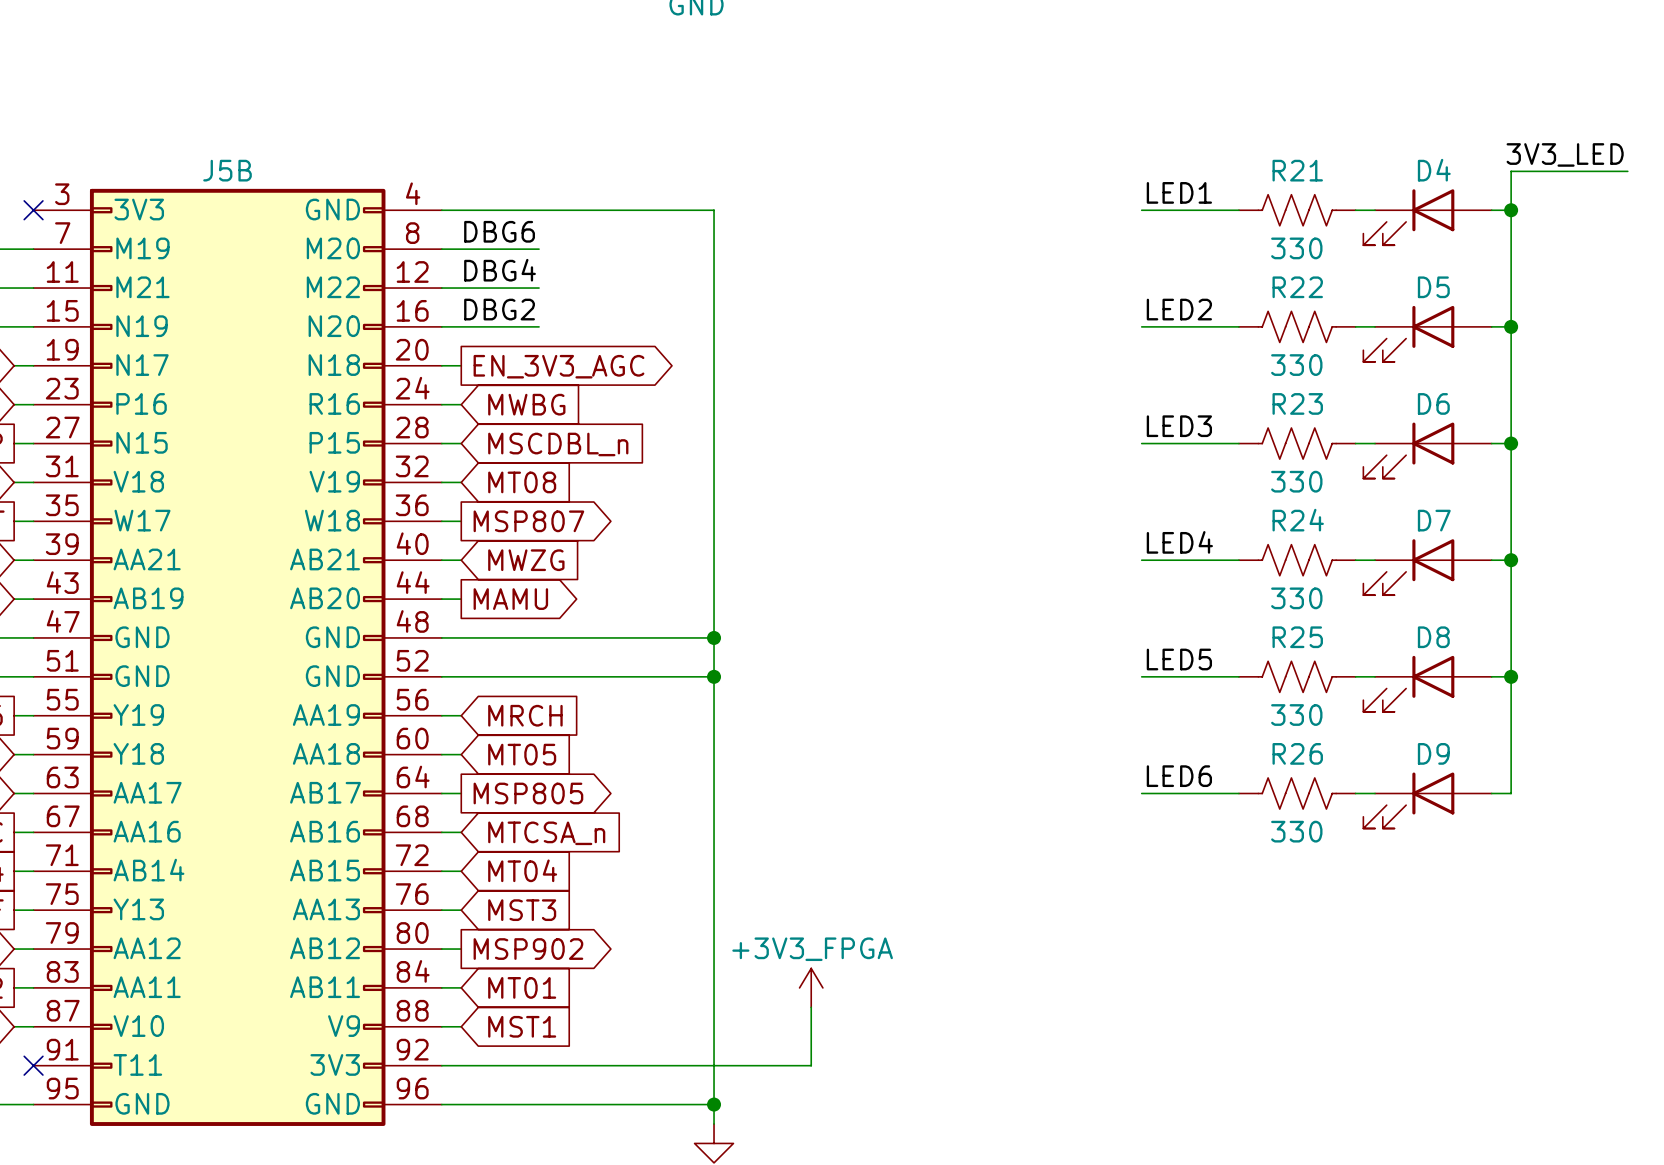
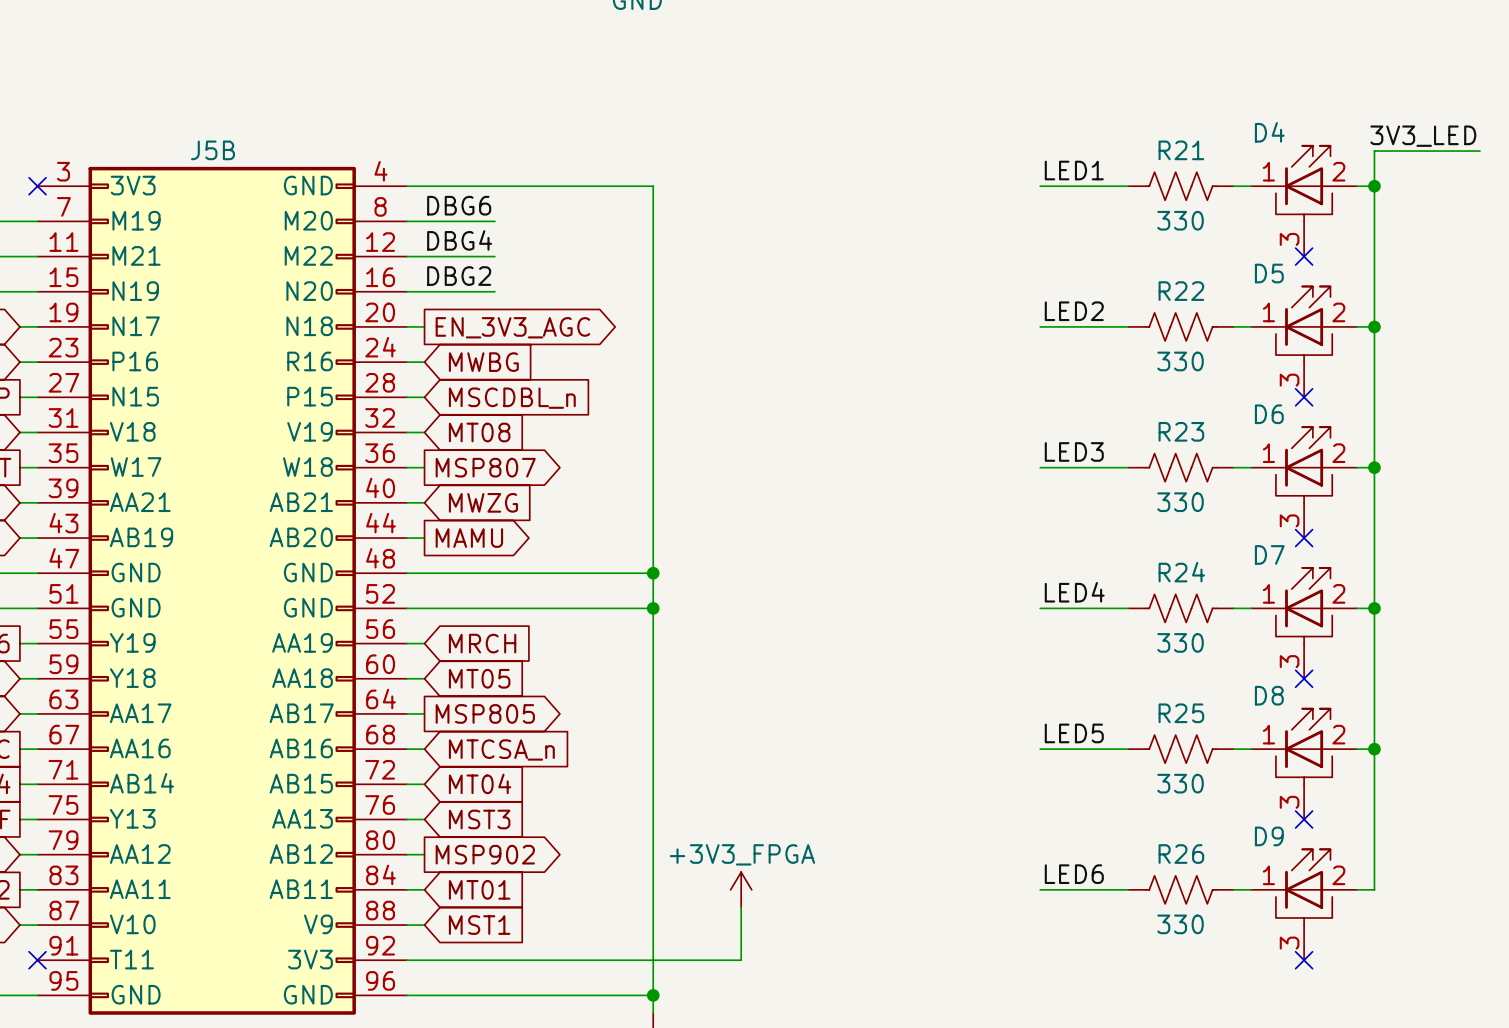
D4 name position: D4 (1434, 170) -> D4 (1269, 132)
D4 symbol: [1363, 189, 1492, 246] -> [1251, 145, 1357, 257]
D5 name position: D5 (1433, 287) -> D5 (1269, 273)
no-connect mark: none -> (1304, 256)
D5 symbol: [1363, 305, 1492, 362] -> [1251, 286, 1357, 398]
label position: LED2 (1179, 309) -> LED2 (1074, 311)
wire: (1141, 326) (1238, 326) -> (1040, 326) (1128, 326)
R22 position: (1297, 326) -> (1180, 326)
wire: (1355, 326) (1375, 326) -> (1233, 326) (1251, 326)
wire: (1491, 326) (1511, 326) -> (1356, 326) (1374, 326)
junction: (1511, 326) -> none
junction: none -> (1374, 326)
D6 name position: D6 (1433, 403) -> D6 (1269, 414)
D6 symbol: [1363, 422, 1492, 479] -> [1251, 427, 1357, 539]
label position: LED3 (1179, 426) -> LED3 (1074, 451)
wire: (1141, 443) (1238, 443) -> none
R23 position: (1297, 443) -> (1180, 467)
wire: (1355, 443) (1375, 443) -> none
no-connect mark: none -> (1304, 397)
wire: (1491, 443) (1511, 443) -> none
junction: (1511, 443) -> none
D7 name position: D7 (1434, 520) -> D7 (1269, 554)
junction: none -> (1374, 467)
D7 symbol: [1363, 539, 1492, 596] -> [1251, 567, 1357, 679]
label: LED4 (1179, 542) -> none
wire: (1141, 560) (1238, 560) -> (1040, 467) (1128, 467)
R24: 330 (1297, 560) -> none
wire: (1355, 560) (1375, 560) -> (1233, 467) (1251, 467)
wire: (1491, 560) (1511, 560) -> (1356, 467) (1374, 467)
junction: (1511, 560) -> none
no-connect mark: none -> (1304, 538)
R25 name: R25 (1297, 637) -> R24 (1181, 572)
D8 name position: D8 (1433, 637) -> D8 (1269, 695)
D8 symbol: [1363, 655, 1492, 712] -> [1251, 708, 1357, 820]
label: LED5 (1179, 659) -> LED4 (1074, 592)
D9 name position: D9 (1433, 753) -> D9 (1269, 836)
no-connect mark: none -> (1304, 678)
D9 symbol: [1363, 772, 1492, 829] -> [1251, 849, 1357, 961]
label position: LED6 (1179, 776) -> LED6 (1074, 874)
wire: (1141, 793) (1238, 793) -> (1040, 749) (1128, 749)
R26 position: (1297, 793) -> (1180, 889)
wire: (1355, 793) (1375, 793) -> (1233, 749) (1251, 749)
wire: (1491, 793) (1511, 793) -> (1356, 889) (1374, 889) (1374, 713)
label: none -> LED5 (1074, 733)
R25: none -> 330 (1180, 749)
wire: none -> (1356, 749) (1374, 749)
junction: none -> (1374, 749)
no-connect mark: none -> (1304, 819)
wire: none -> (1040, 889) (1128, 889)
wire: none -> (1233, 889) (1251, 889)
no-connect mark: none -> (1304, 960)

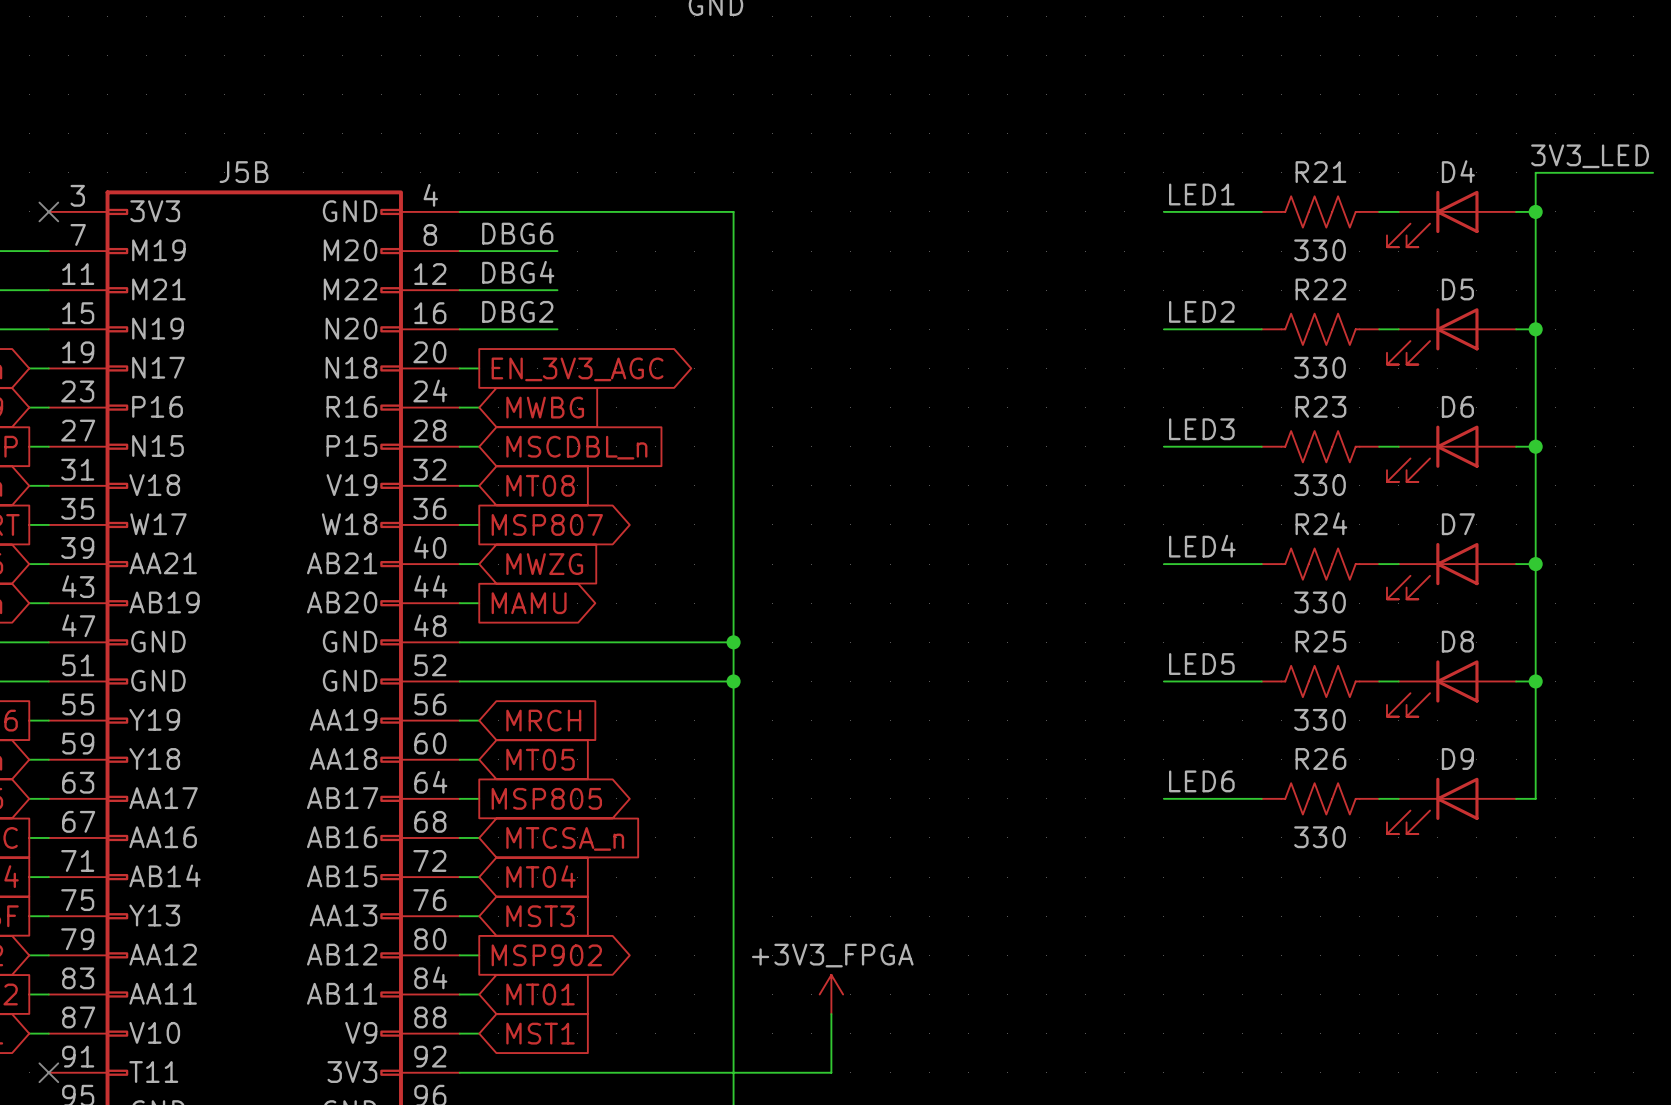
D4 name position: D4 (1269, 132) -> D4 (1458, 171)
D4 symbol: [1251, 145, 1357, 257] -> [1386, 190, 1517, 248]
no-connect mark: (1304, 256) -> none
D5 name position: D5 (1269, 273) -> D5 (1457, 289)
D5 symbol: [1251, 286, 1357, 398] -> [1386, 308, 1517, 365]
junction: none -> (1535, 329)
label position: LED2 (1074, 311) -> LED2 (1201, 311)
wire: (1040, 326) (1128, 326) -> (1163, 329) (1261, 329)
R22 position: (1180, 326) -> (1320, 329)
wire: (1233, 326) (1251, 326) -> (1379, 329) (1398, 329)
wire: (1356, 326) (1374, 326) -> (1516, 329) (1535, 329)
junction: (1374, 326) -> none
wire: none -> (1163, 446) (1261, 446)
wire: none -> (1379, 446) (1398, 446)
no-connect mark: (1304, 397) -> none
wire: none -> (1516, 446) (1535, 446)
junction: none -> (1535, 446)
D6 name position: D6 (1269, 414) -> D6 (1457, 406)
D6 symbol: [1251, 427, 1357, 539] -> [1386, 425, 1517, 482]
label position: LED3 (1074, 451) -> LED3 (1201, 429)
wire: (1040, 467) (1128, 467) -> (1163, 564) (1261, 564)
R23 position: (1180, 467) -> (1320, 446)
wire: (1233, 467) (1251, 467) -> (1379, 564) (1398, 564)
wire: (1356, 467) (1374, 467) -> (1516, 564) (1535, 564)
junction: (1374, 467) -> none
label: none -> LED4 (1202, 546)
R24: none -> 330 (1320, 564)
junction: none -> (1535, 564)
no-connect mark: (1304, 538) -> none
D7 name position: D7 (1269, 554) -> D7 (1458, 524)
D7 symbol: [1251, 567, 1357, 679] -> [1386, 542, 1517, 600]
R24 name: R24 (1181, 572) -> R25 (1320, 641)
label: LED4 (1074, 592) -> LED5 (1201, 664)
no-connect mark: (1304, 678) -> none
D8 name position: D8 (1269, 695) -> D8 (1457, 641)
D8 symbol: [1251, 708, 1357, 820] -> [1386, 660, 1517, 717]
wire: (1374, 713) (1374, 889) (1356, 889) -> (1535, 798) (1516, 798)
label: LED5 (1074, 733) -> none
wire: (1040, 749) (1128, 749) -> (1163, 798) (1261, 798)
R25: 330 (1180, 749) -> none
wire: (1233, 749) (1251, 749) -> (1379, 798) (1398, 798)
wire: (1356, 749) (1374, 749) -> none
junction: (1374, 749) -> none
no-connect mark: (1304, 819) -> none
D9 name position: D9 (1269, 836) -> D9 (1457, 758)
D9 symbol: [1251, 849, 1357, 961] -> [1386, 777, 1517, 835]
label position: LED6 (1074, 874) -> LED6 (1201, 781)
wire: (1040, 889) (1128, 889) -> none
R26 position: (1180, 889) -> (1320, 798)
wire: (1233, 889) (1251, 889) -> none
no-connect mark: (1304, 960) -> none

